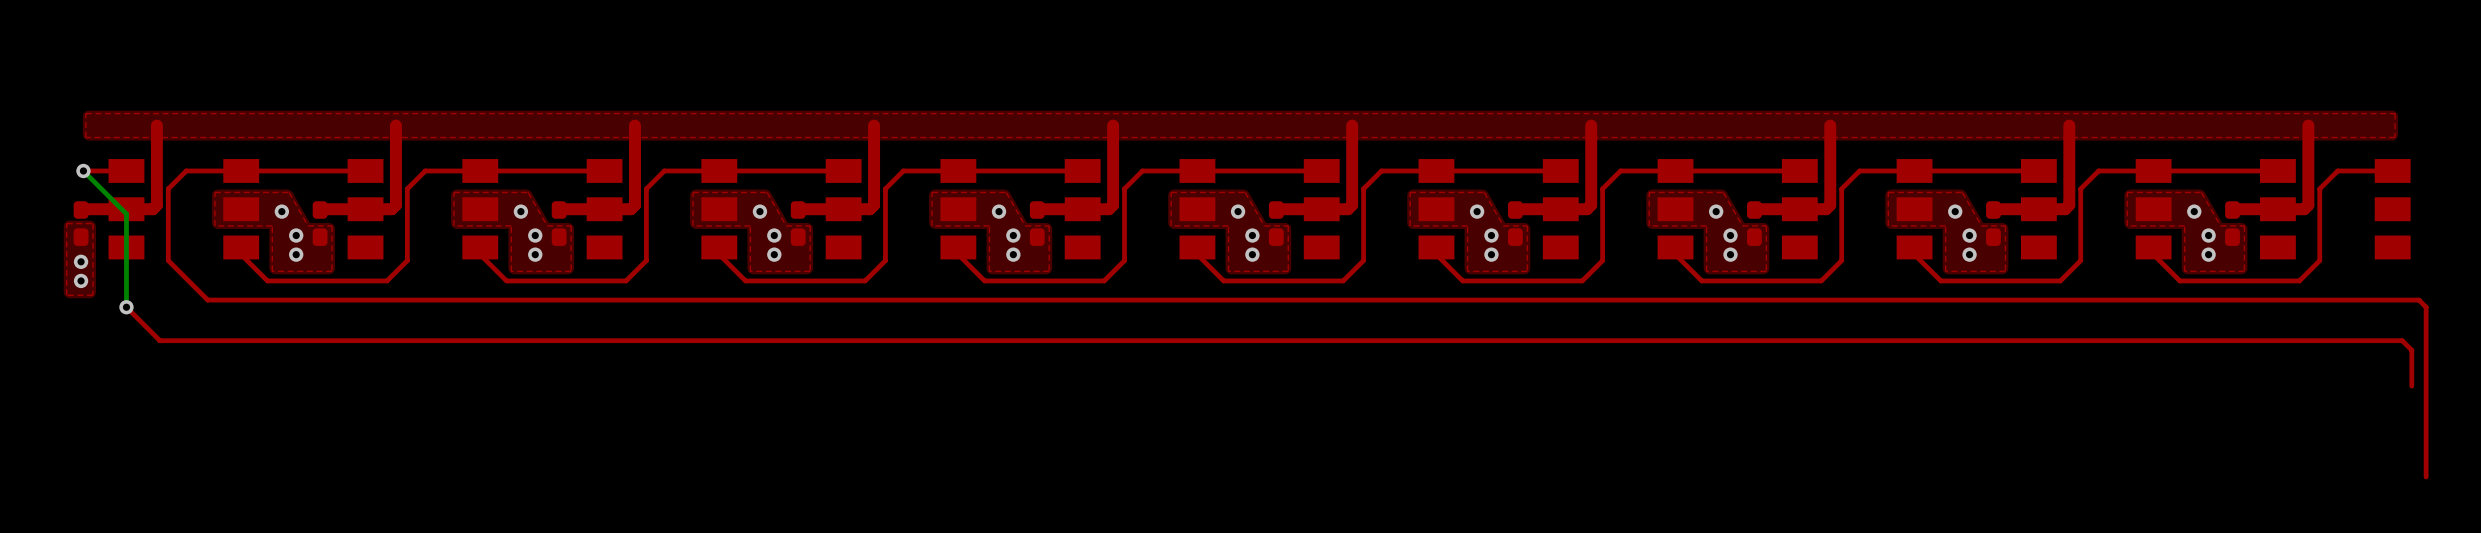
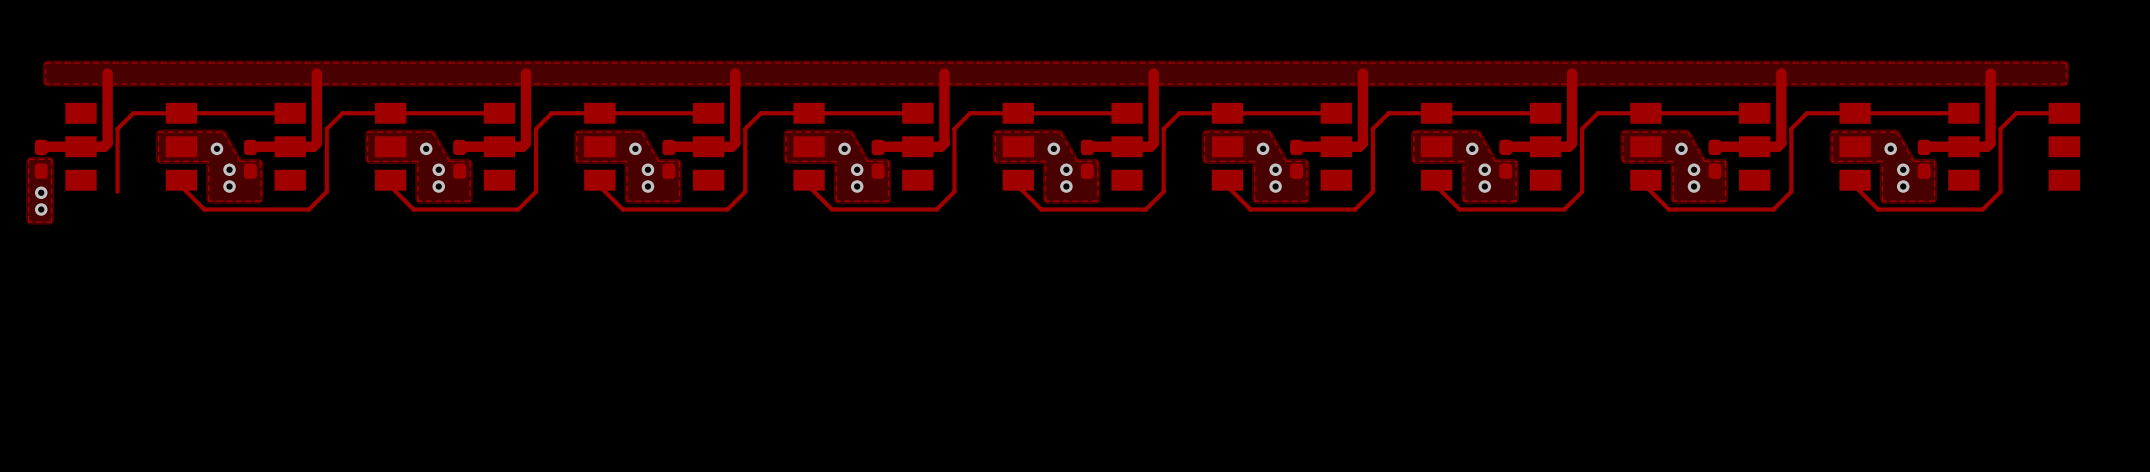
bottom track: (83, 170) (126, 214) (126, 307) -> none
via: (83, 170) -> none
top track: (126, 170) (83, 170) -> none
top track: (168, 260) (207, 300) (2418, 300) (2426, 307) (2426, 476) -> none
top track: (126, 307) (159, 340) (2402, 340) (2411, 350) (2411, 386) -> none
via: (126, 307) -> none

